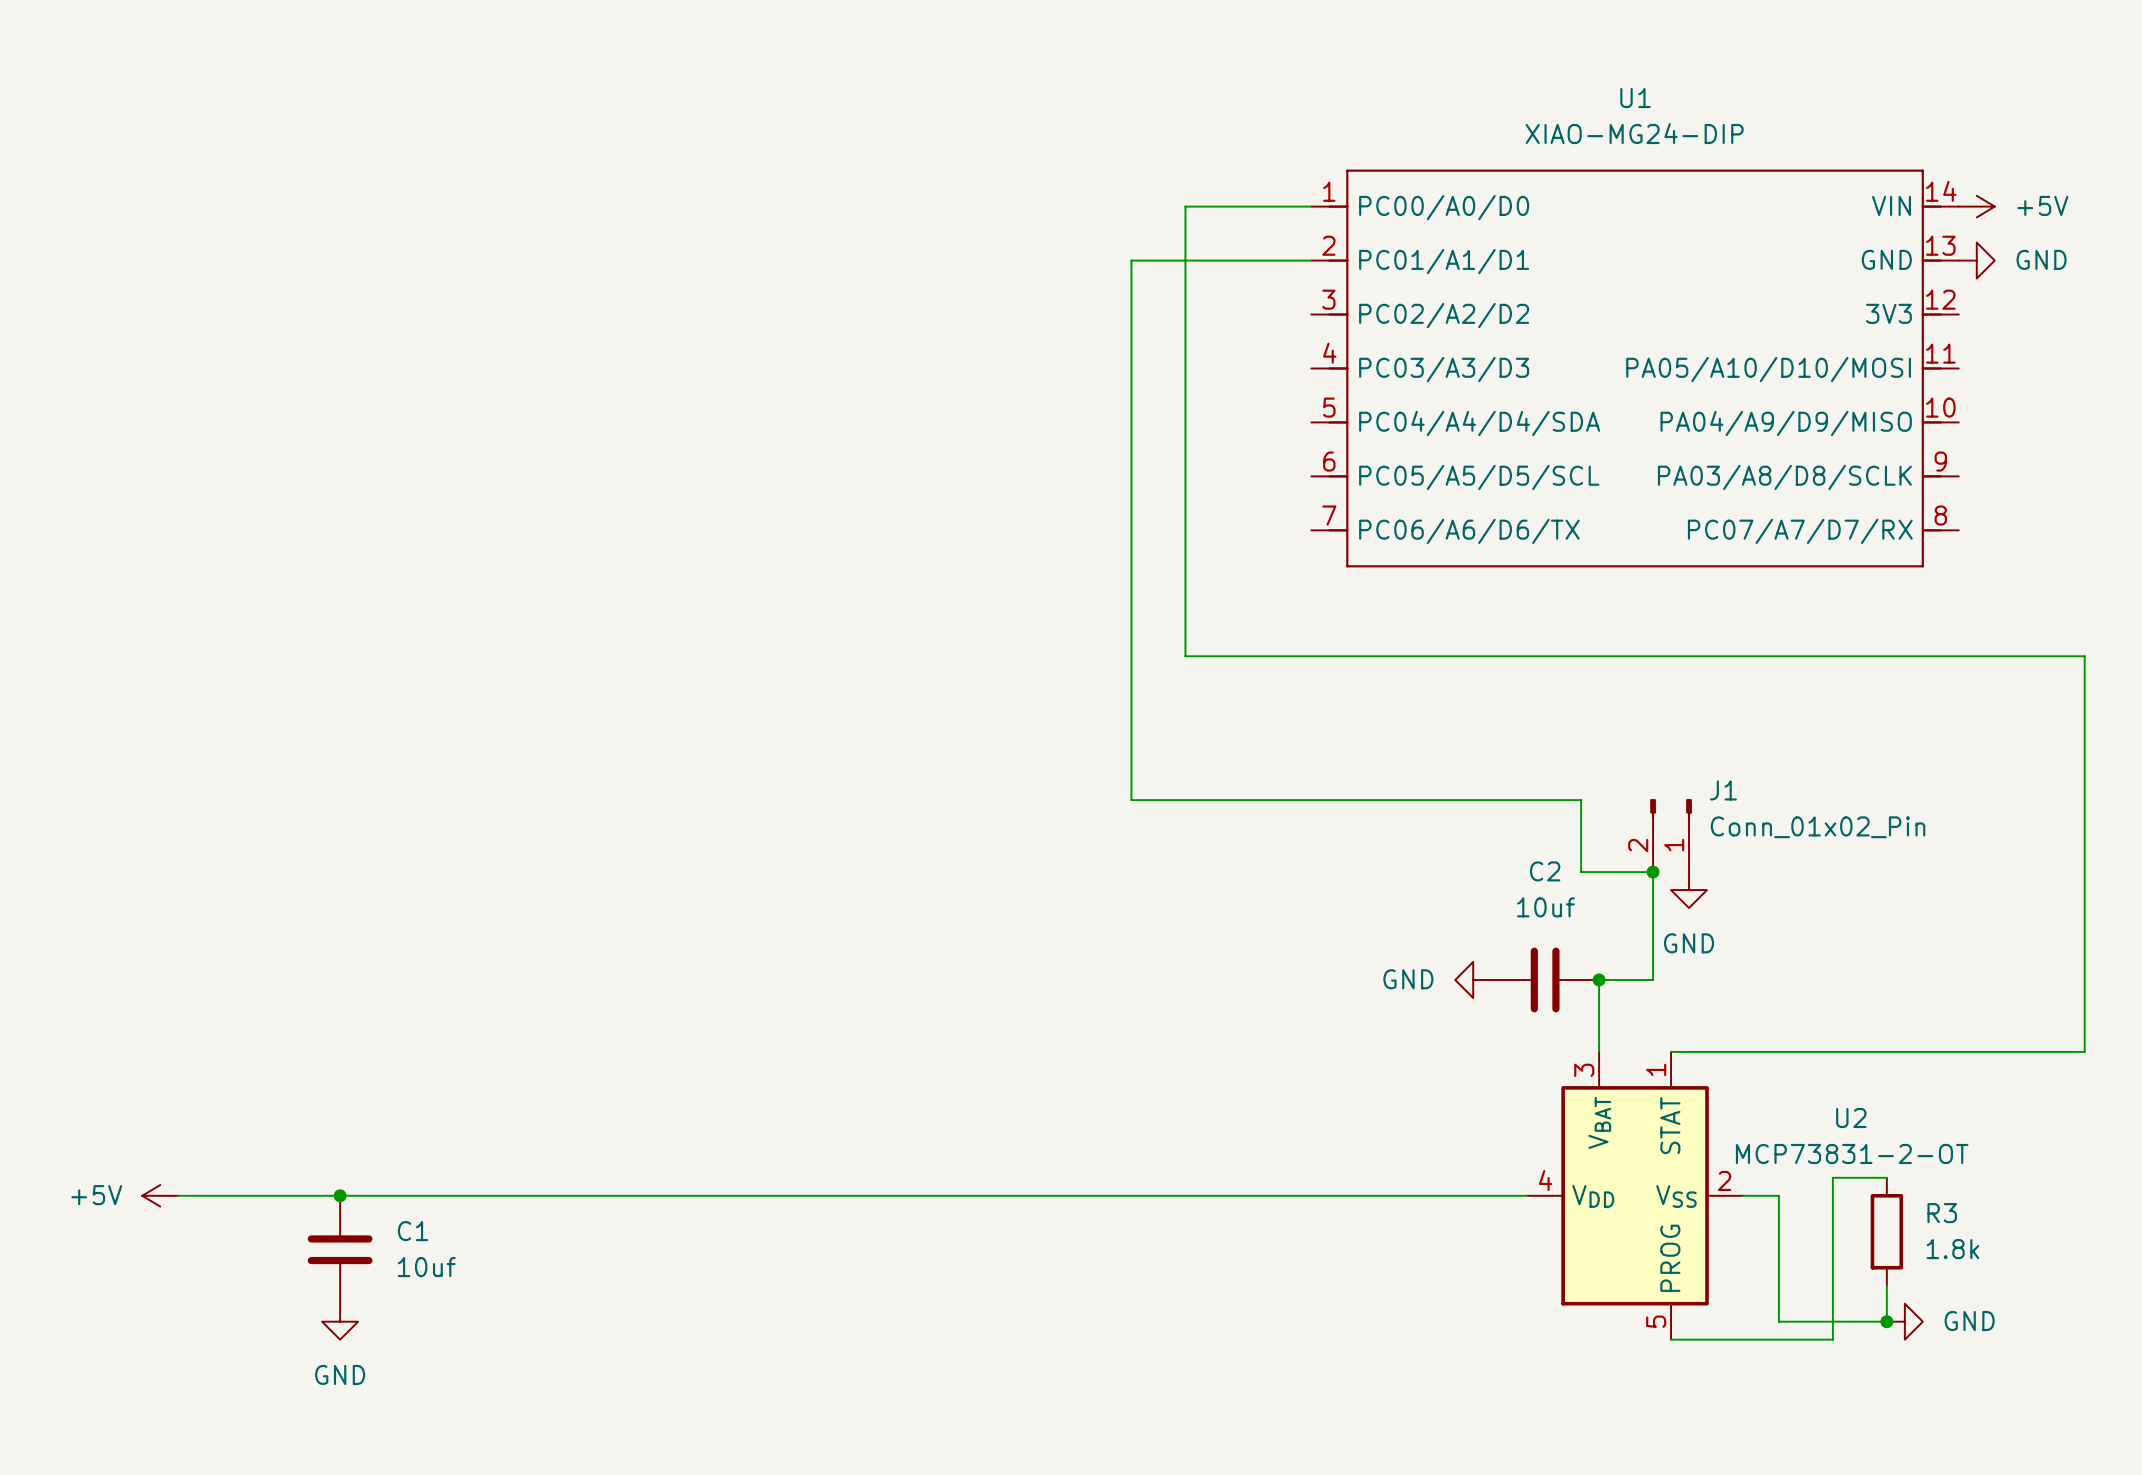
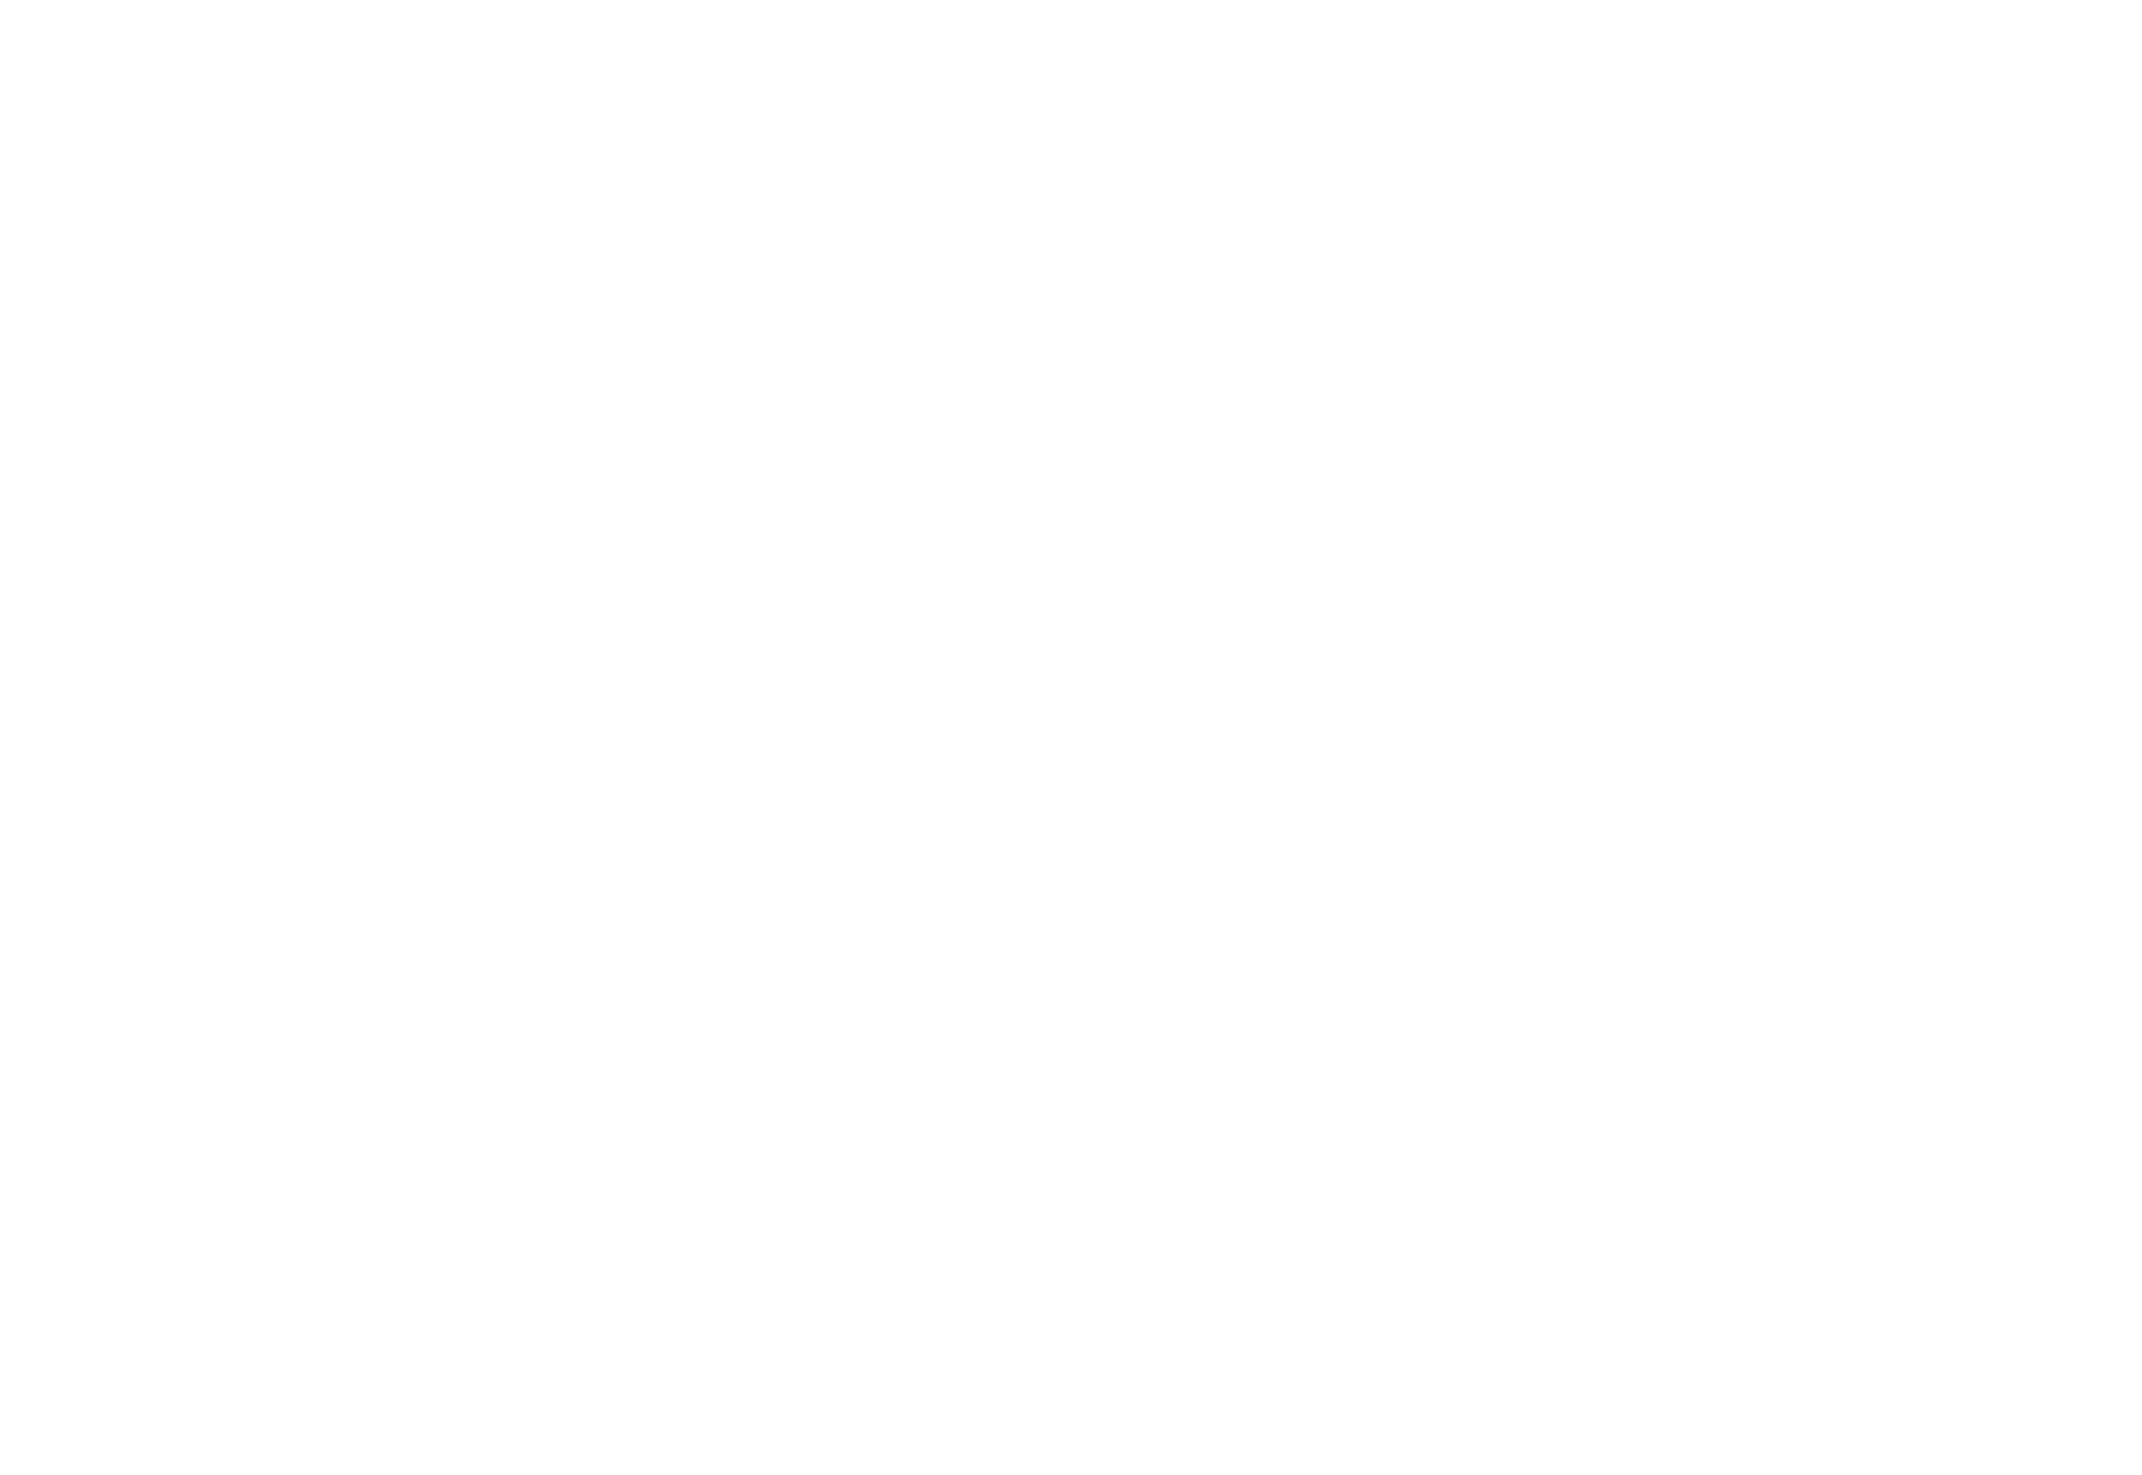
wire: (1311, 206) (1185, 206) (1185, 656) (2084, 656) (2084, 1051) (1671, 1051) -> none
power symbol: +5V (1976, 206) -> none
wire: (1311, 260) (1131, 260) (1131, 800) (1581, 800) (1581, 872) (1653, 872) (1653, 979) (1599, 979) (1599, 1051) -> none
power symbol: GND (1976, 260) -> none
U1: XIAO-MG24-DIP (1635, 368) -> none
J1: Conn_01x02_Pin (1671, 835) -> none
junction: (1653, 872) -> none
power symbol: GND (1689, 890) -> none
power symbol: GND (1473, 979) -> none
C2: 10uf (1545, 979) -> none
junction: (1599, 979) -> none
wire: (1886, 1177) (1832, 1177) (1832, 1339) (1671, 1339) -> none
power symbol: +5V (160, 1195) -> none
wire: (178, 1195) (1527, 1195) -> none
junction: (340, 1195) -> none
U2: MCP73831-2-OT (1635, 1195) -> none
wire: (1742, 1195) (1778, 1195) (1778, 1321) (1886, 1321) (1886, 1285) -> none
R3: 1.8k (1886, 1231) -> none
C1: 10uf (340, 1249) -> none
power symbol: GND (340, 1321) -> none
junction: (1886, 1321) -> none
power symbol: GND (1904, 1321) -> none

